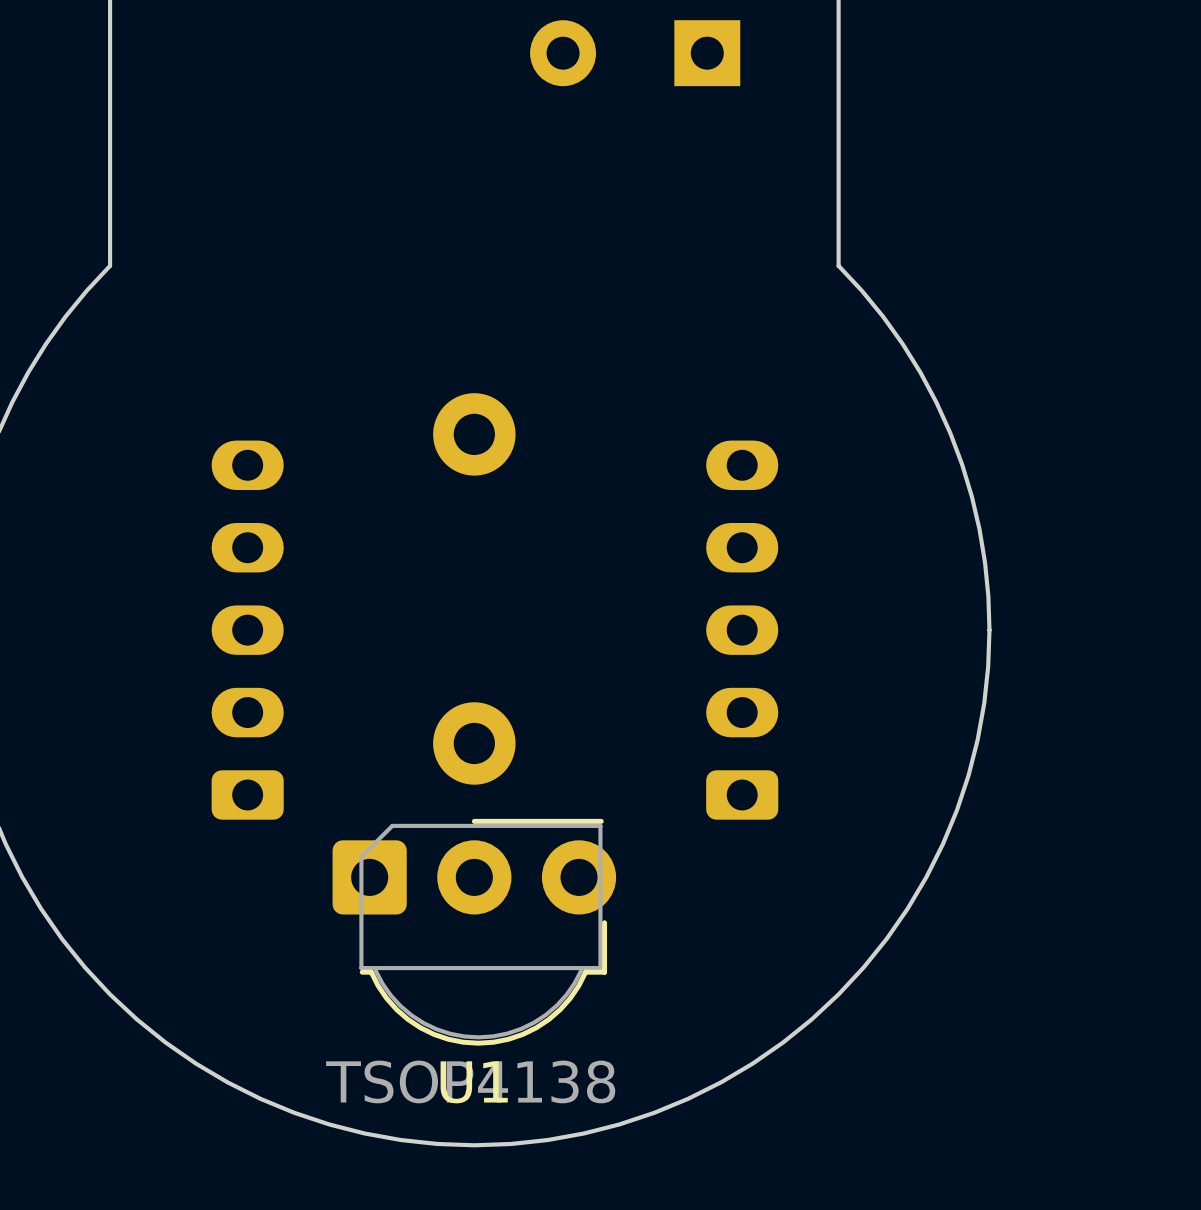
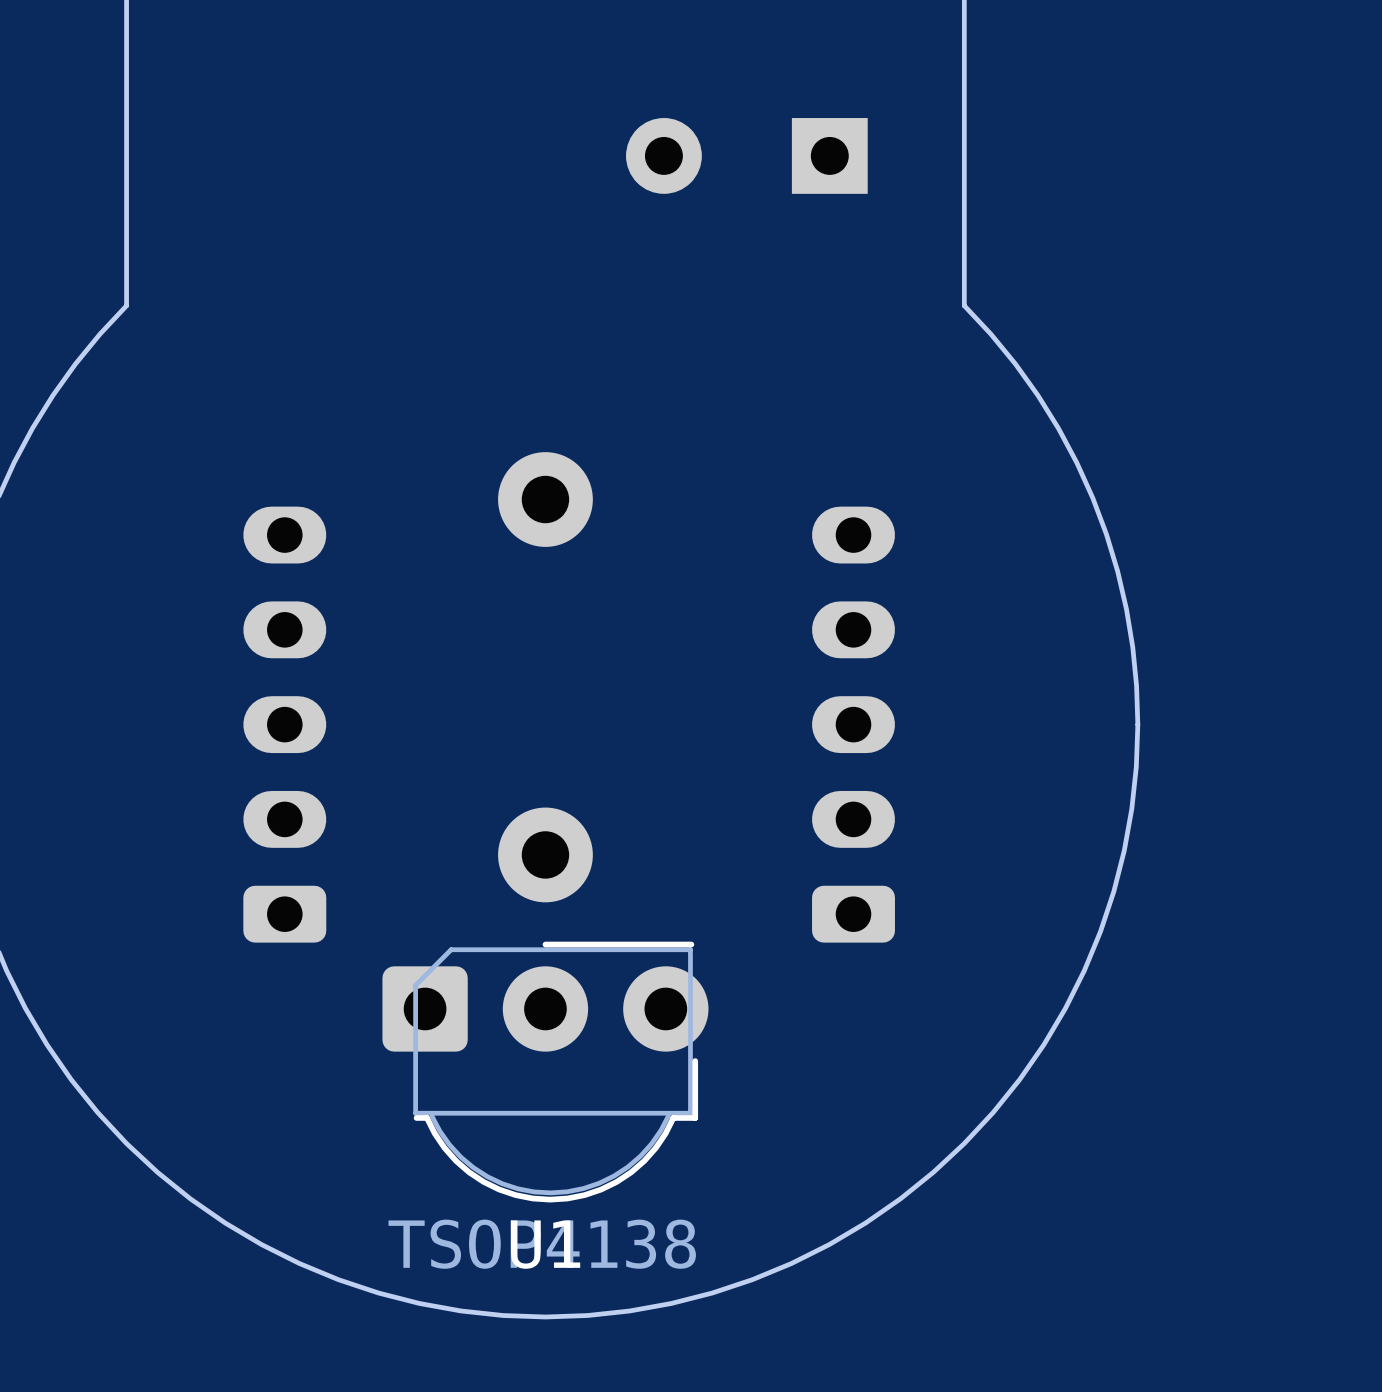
part position: (635, 53) -> (746, 155)

